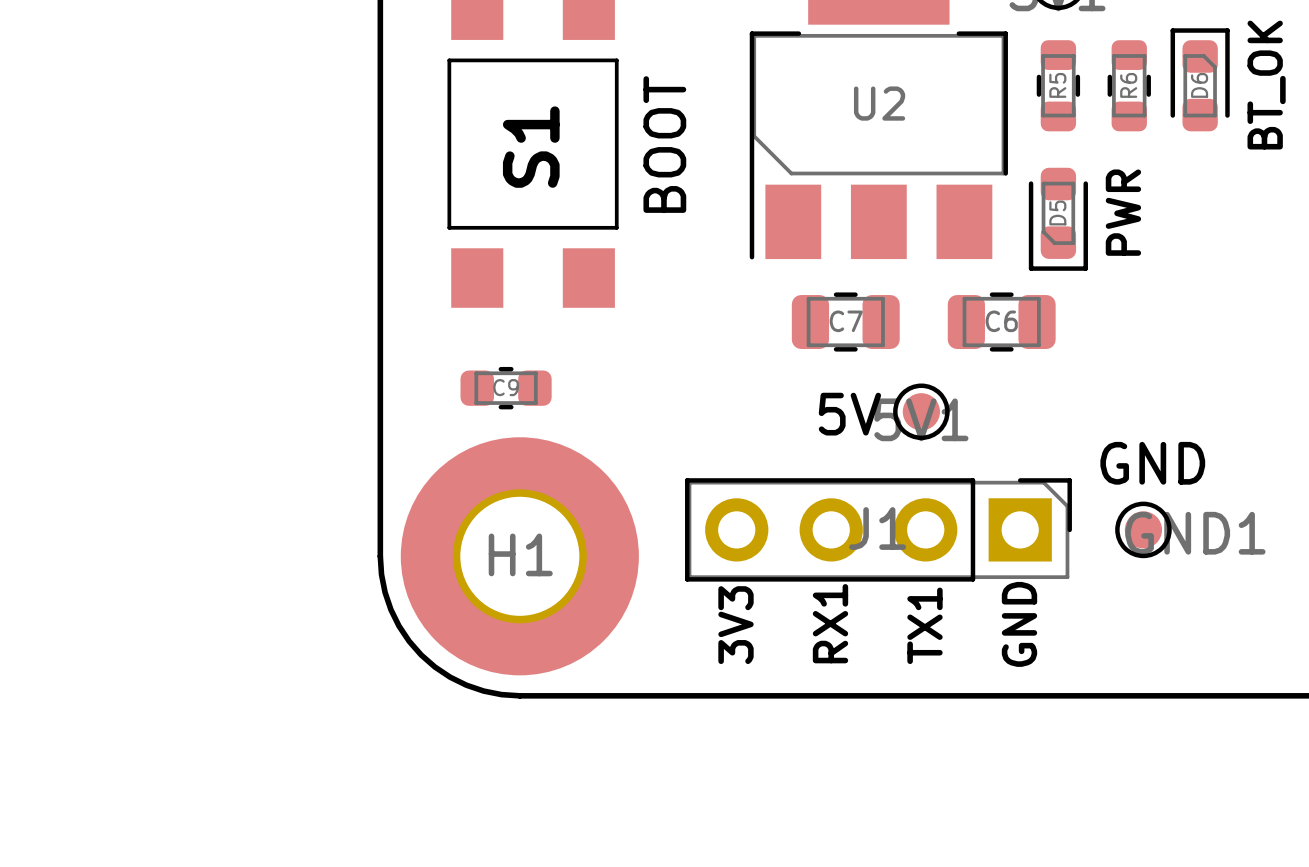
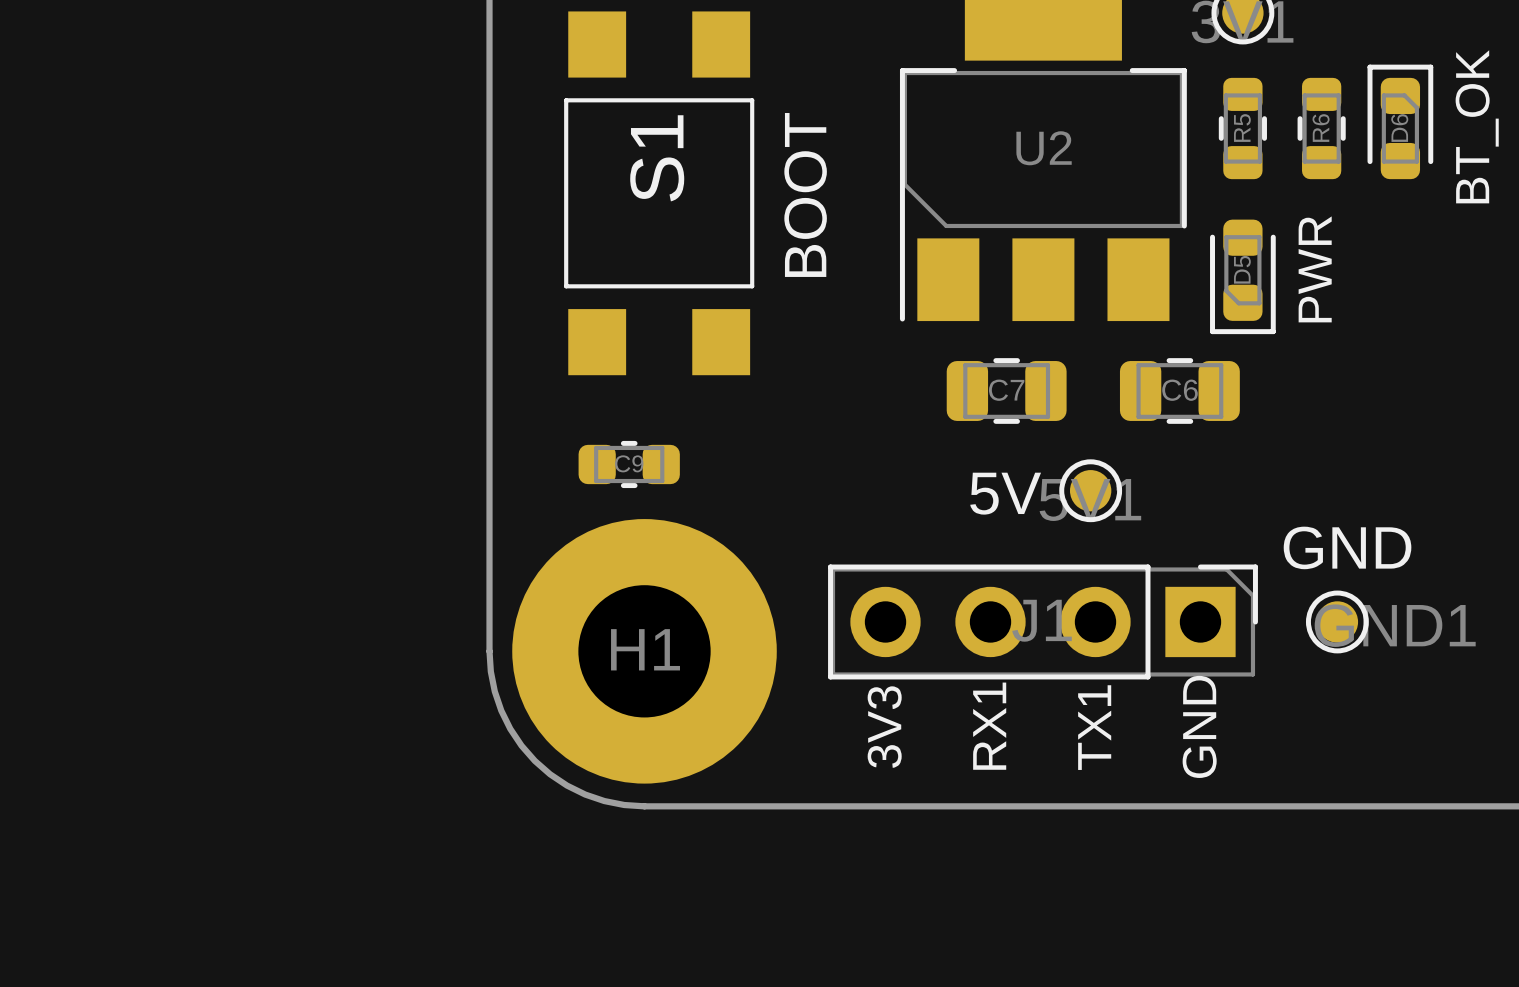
S1 name position: S1 (531, 147) -> S1 (657, 158)

